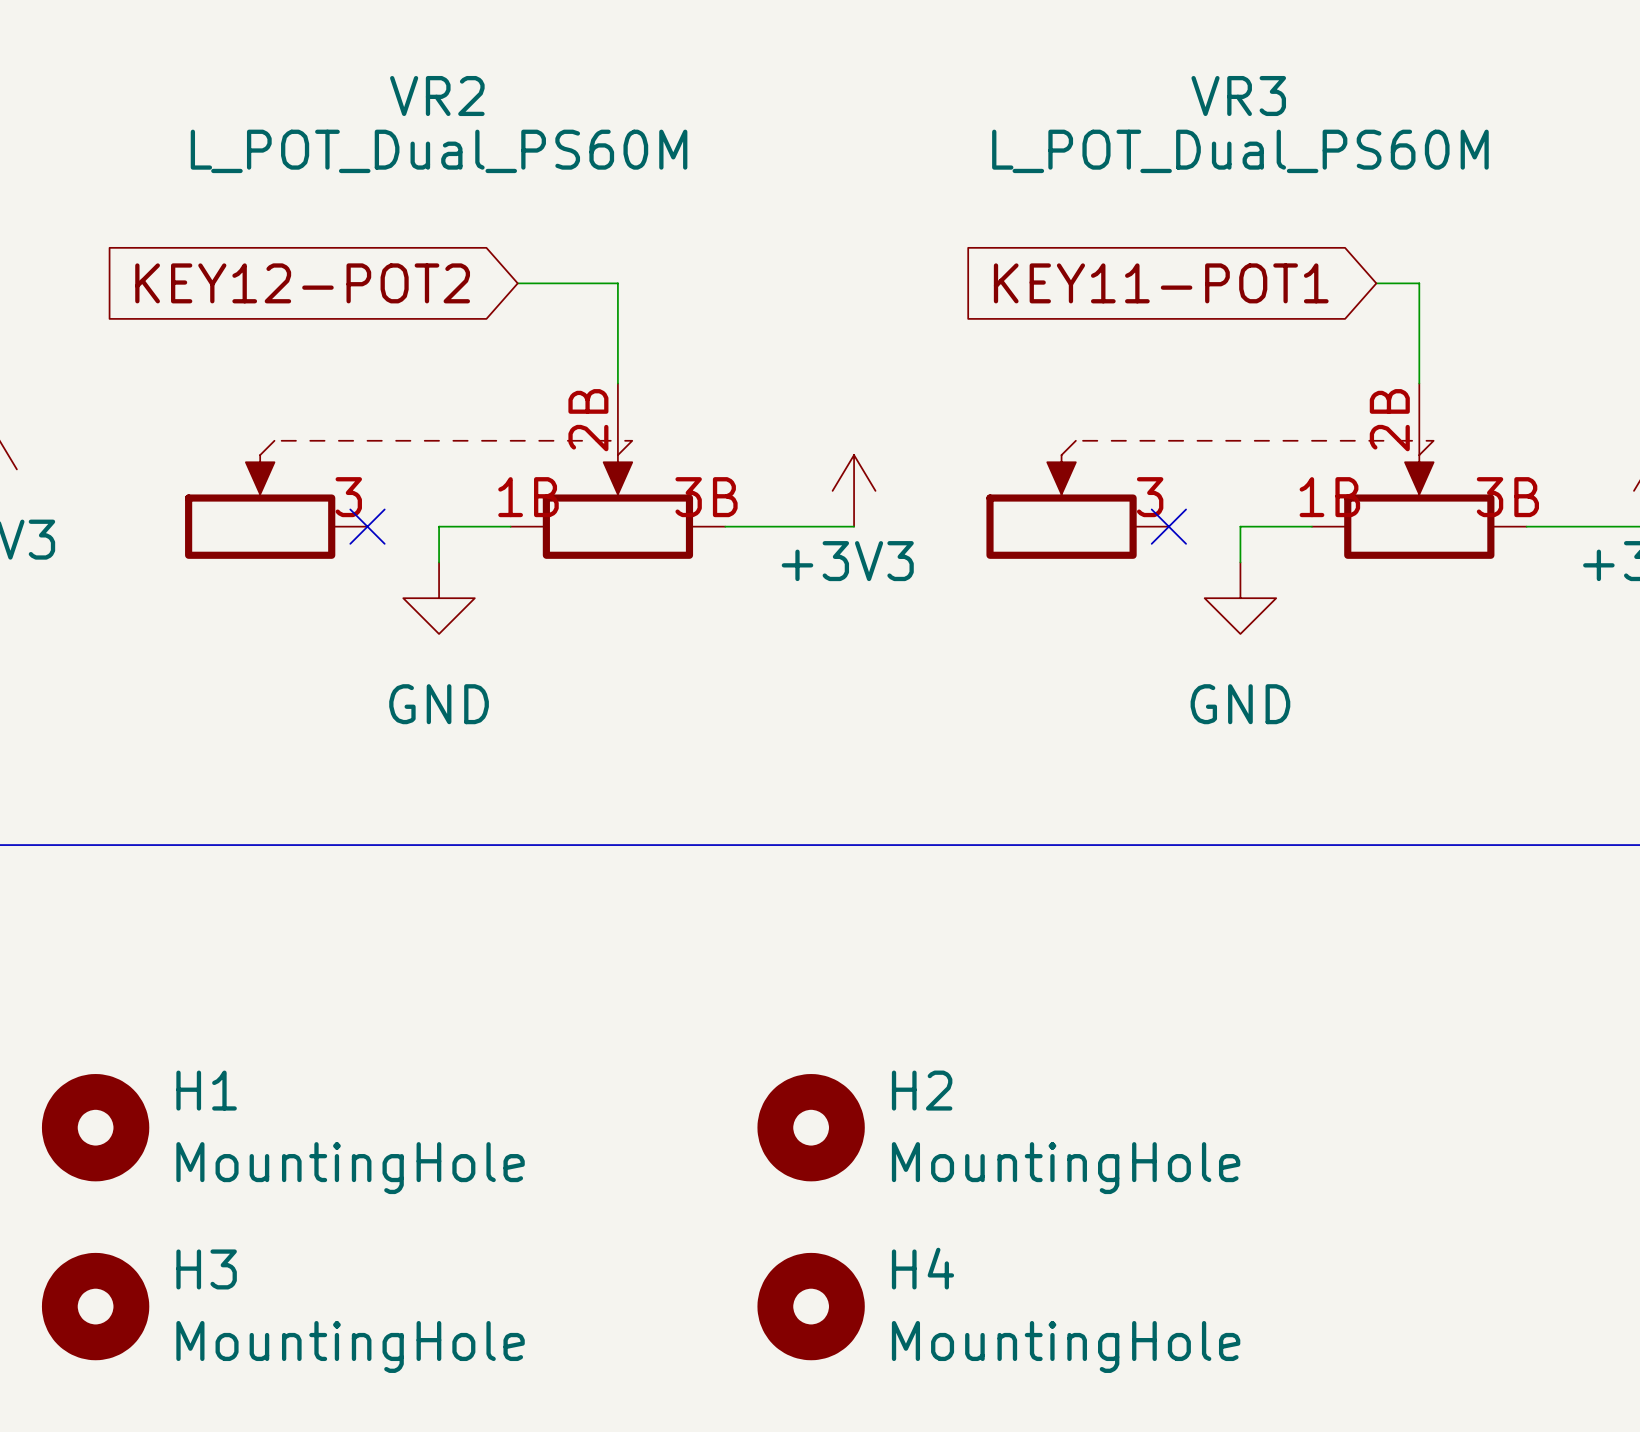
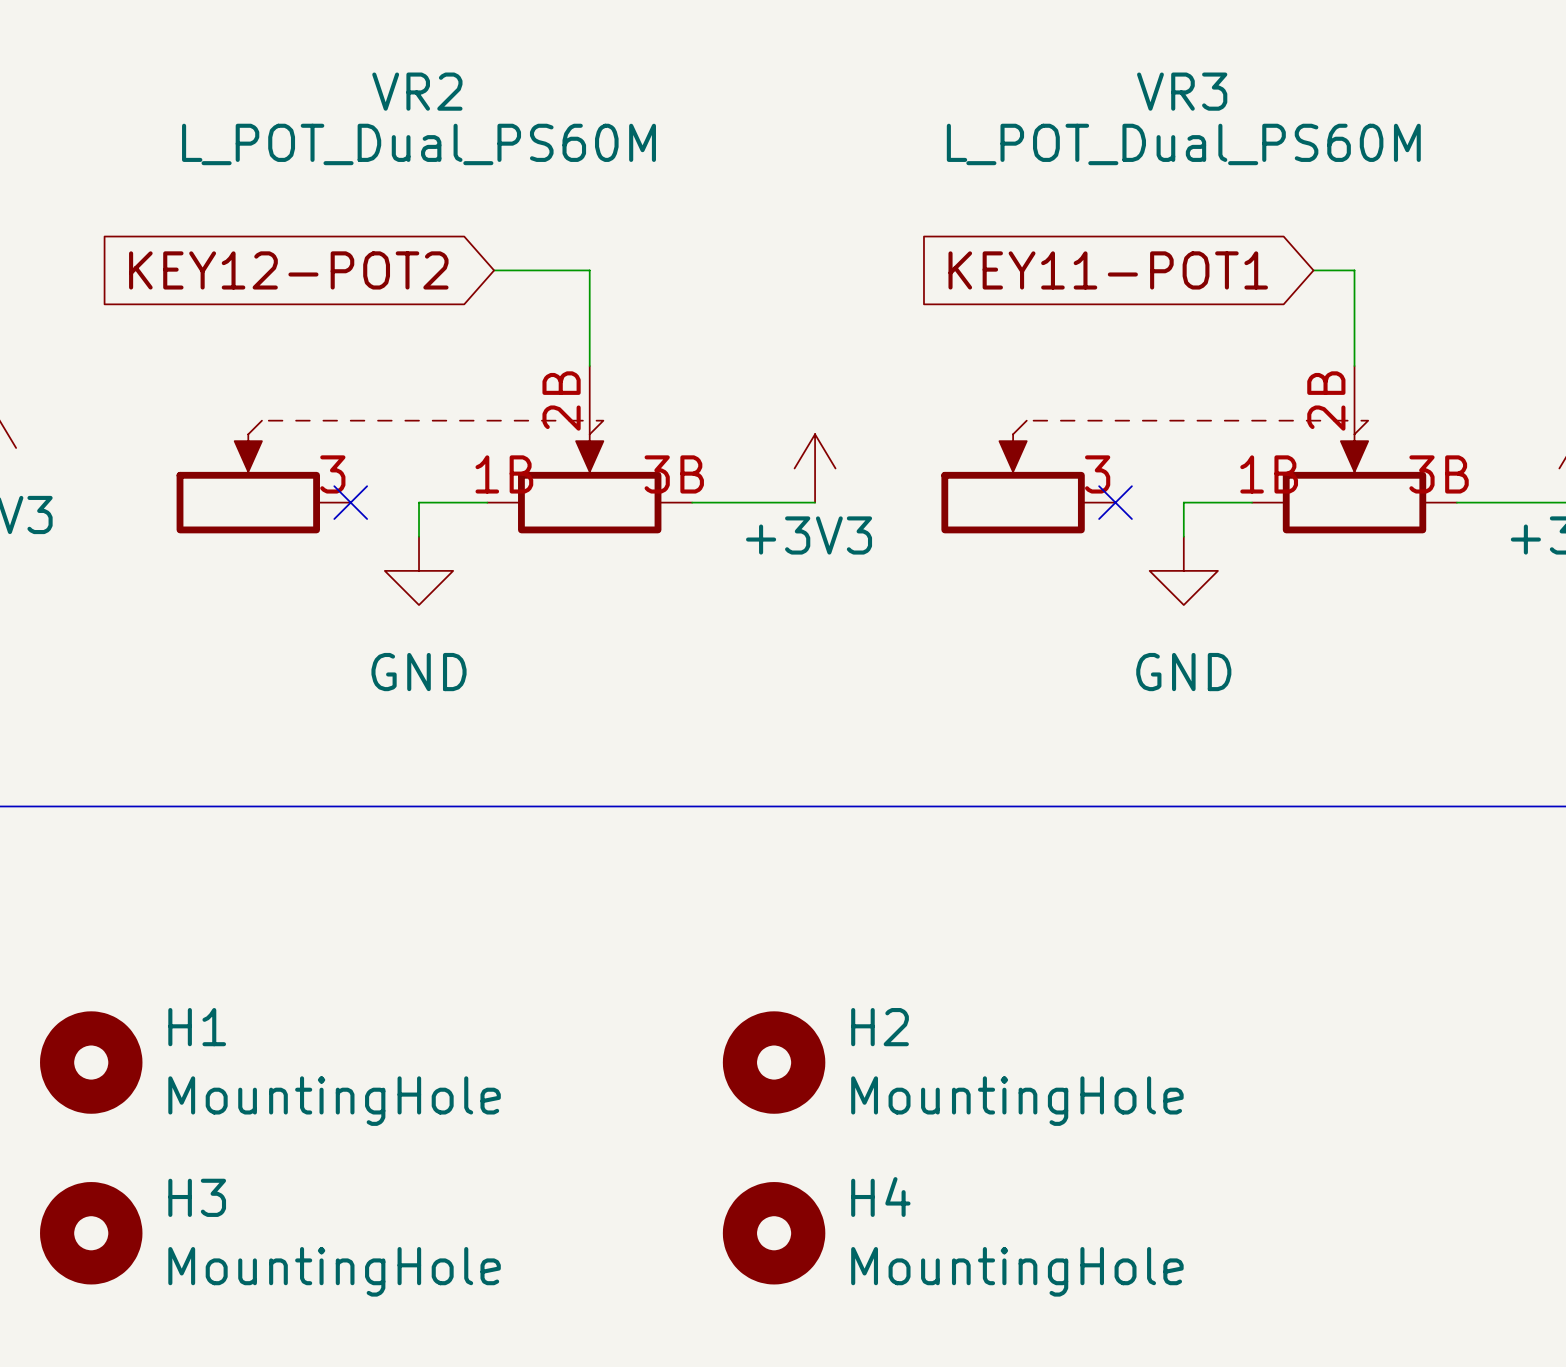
H1 position: (95, 1127) -> (91, 1062)
H2 position: (811, 1127) -> (774, 1062)
H3 position: (95, 1306) -> (91, 1233)
H4 position: (811, 1306) -> (774, 1233)

